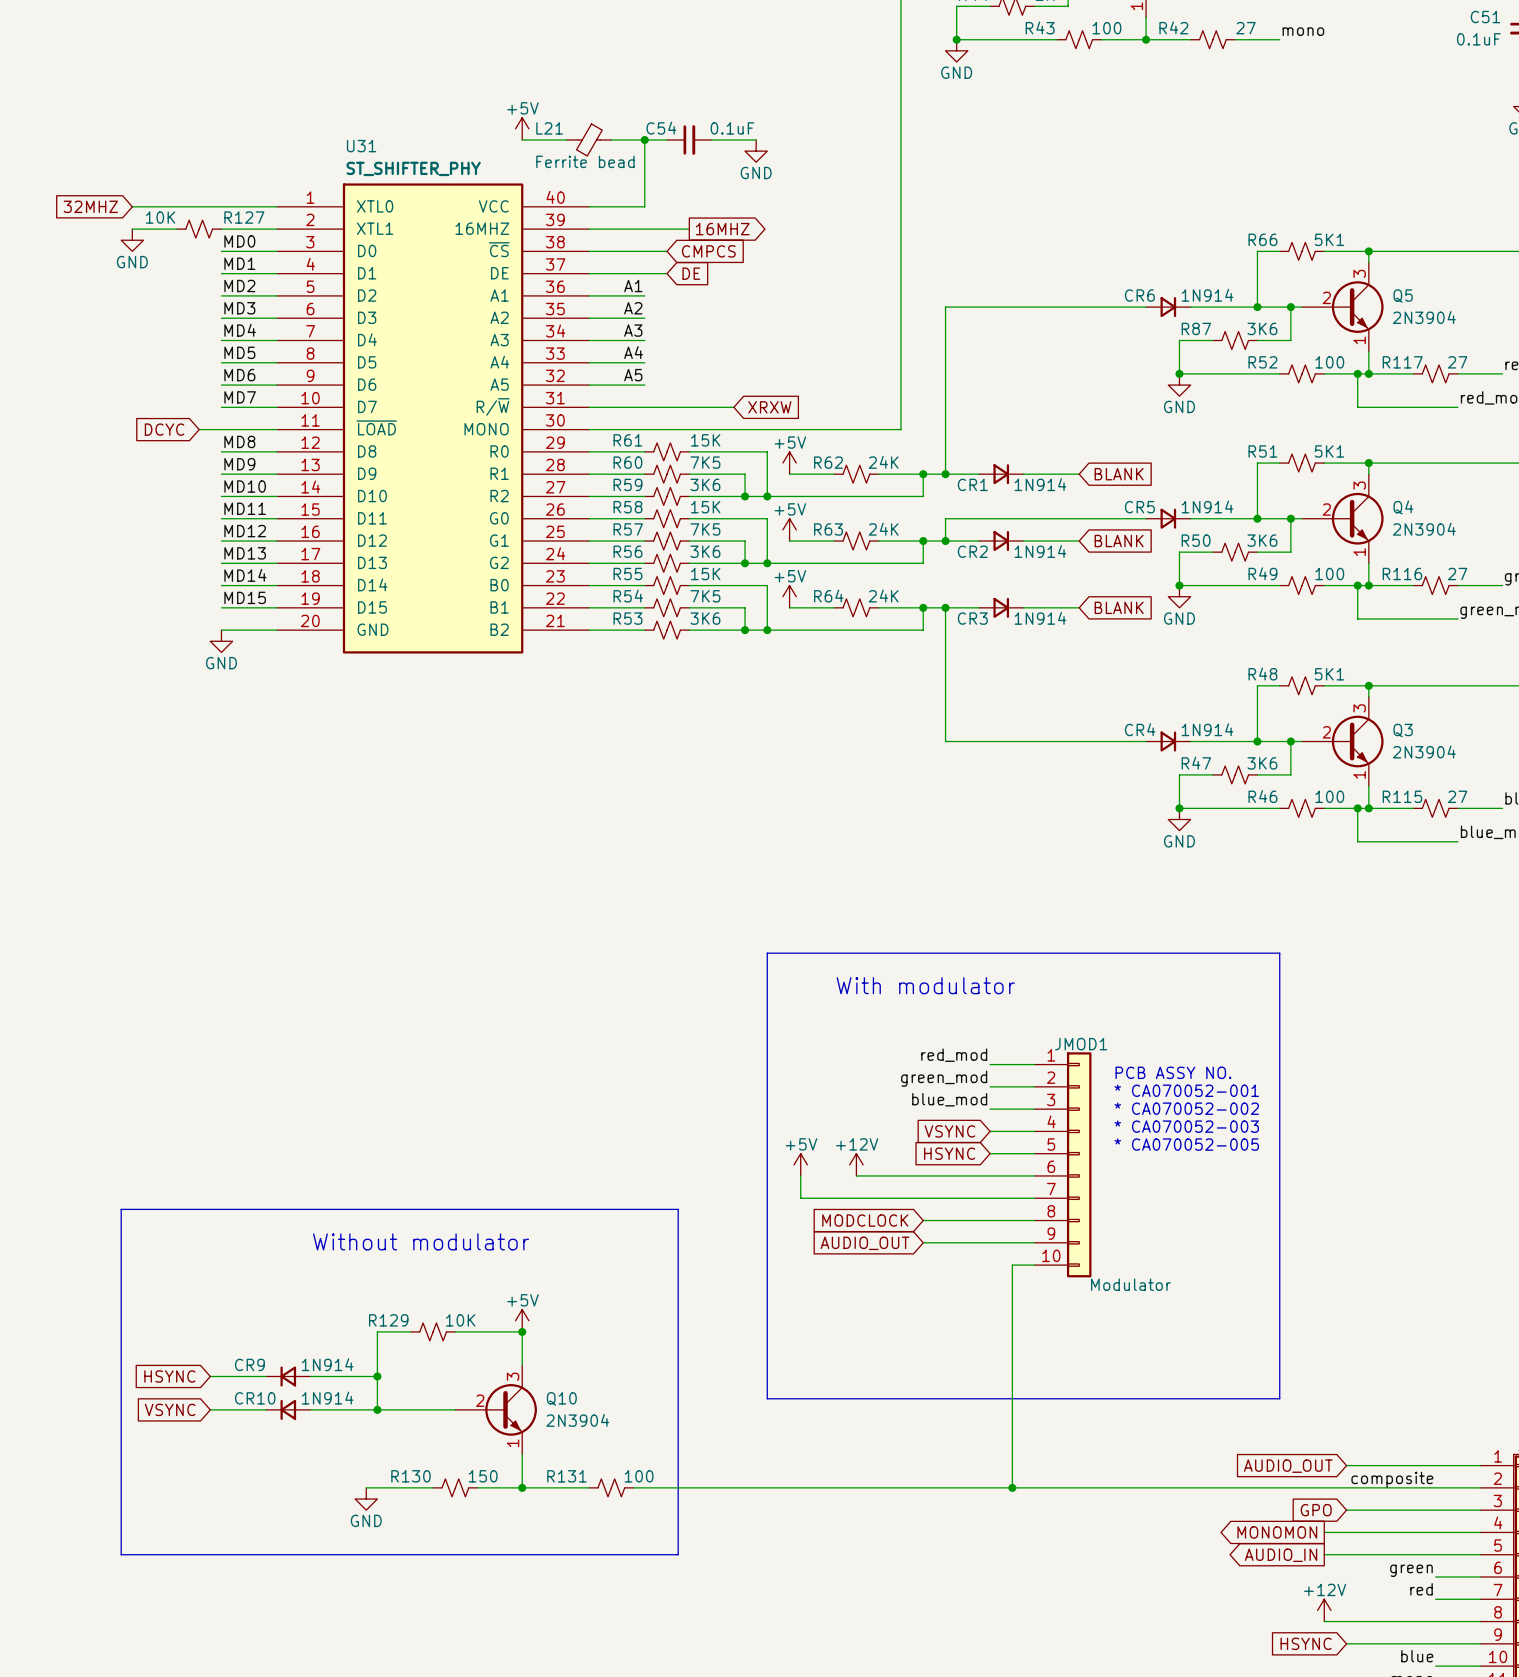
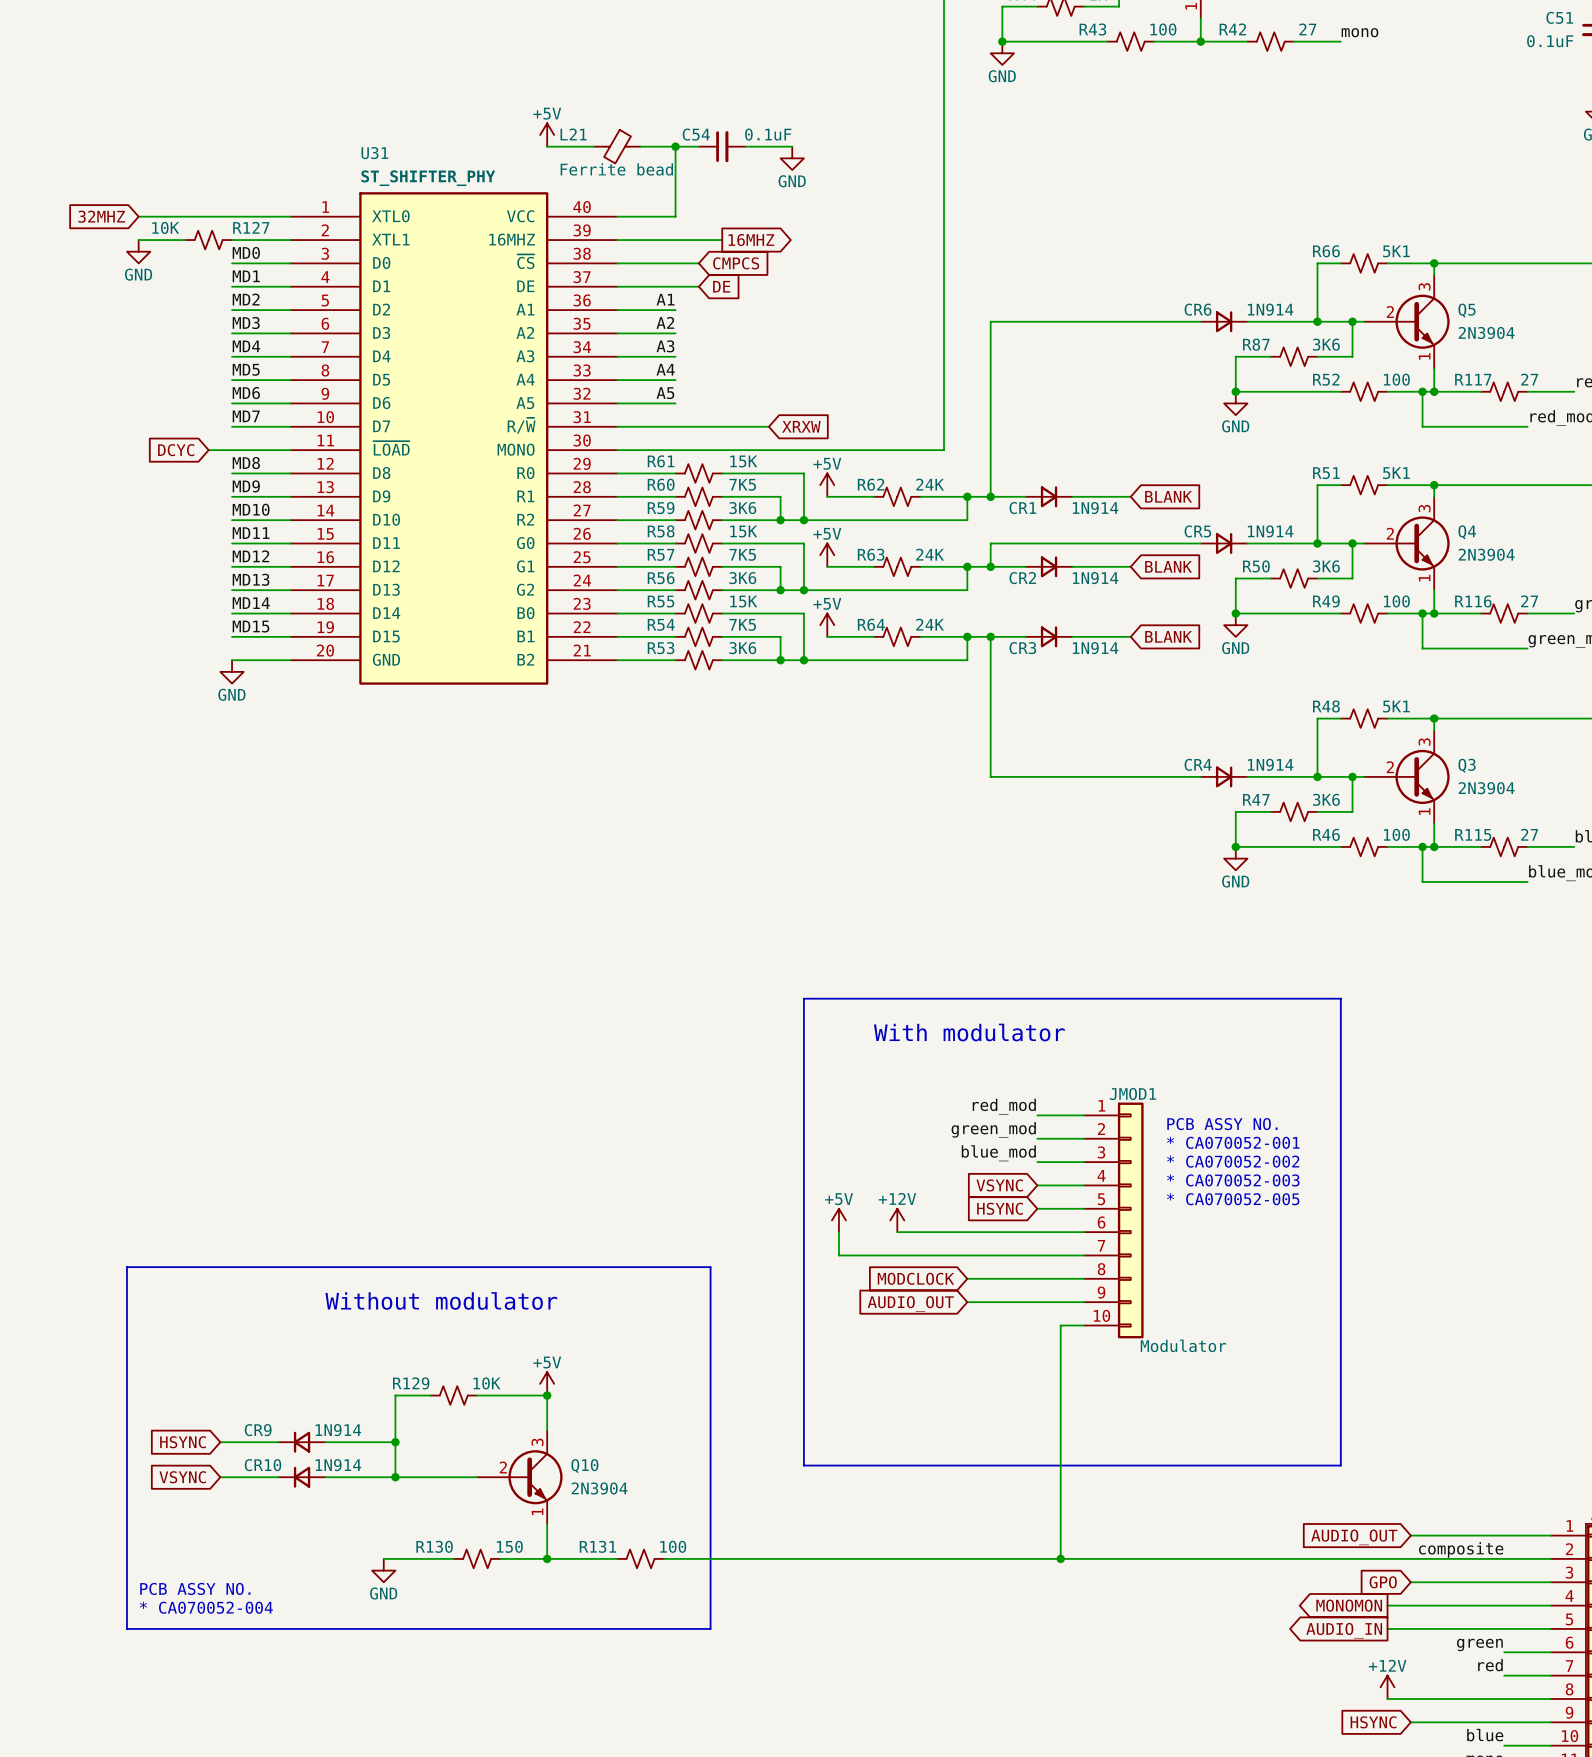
text: none -> PCB ASSY NO. (195, 1588)
text: none -> * CA070052-004 (206, 1607)

